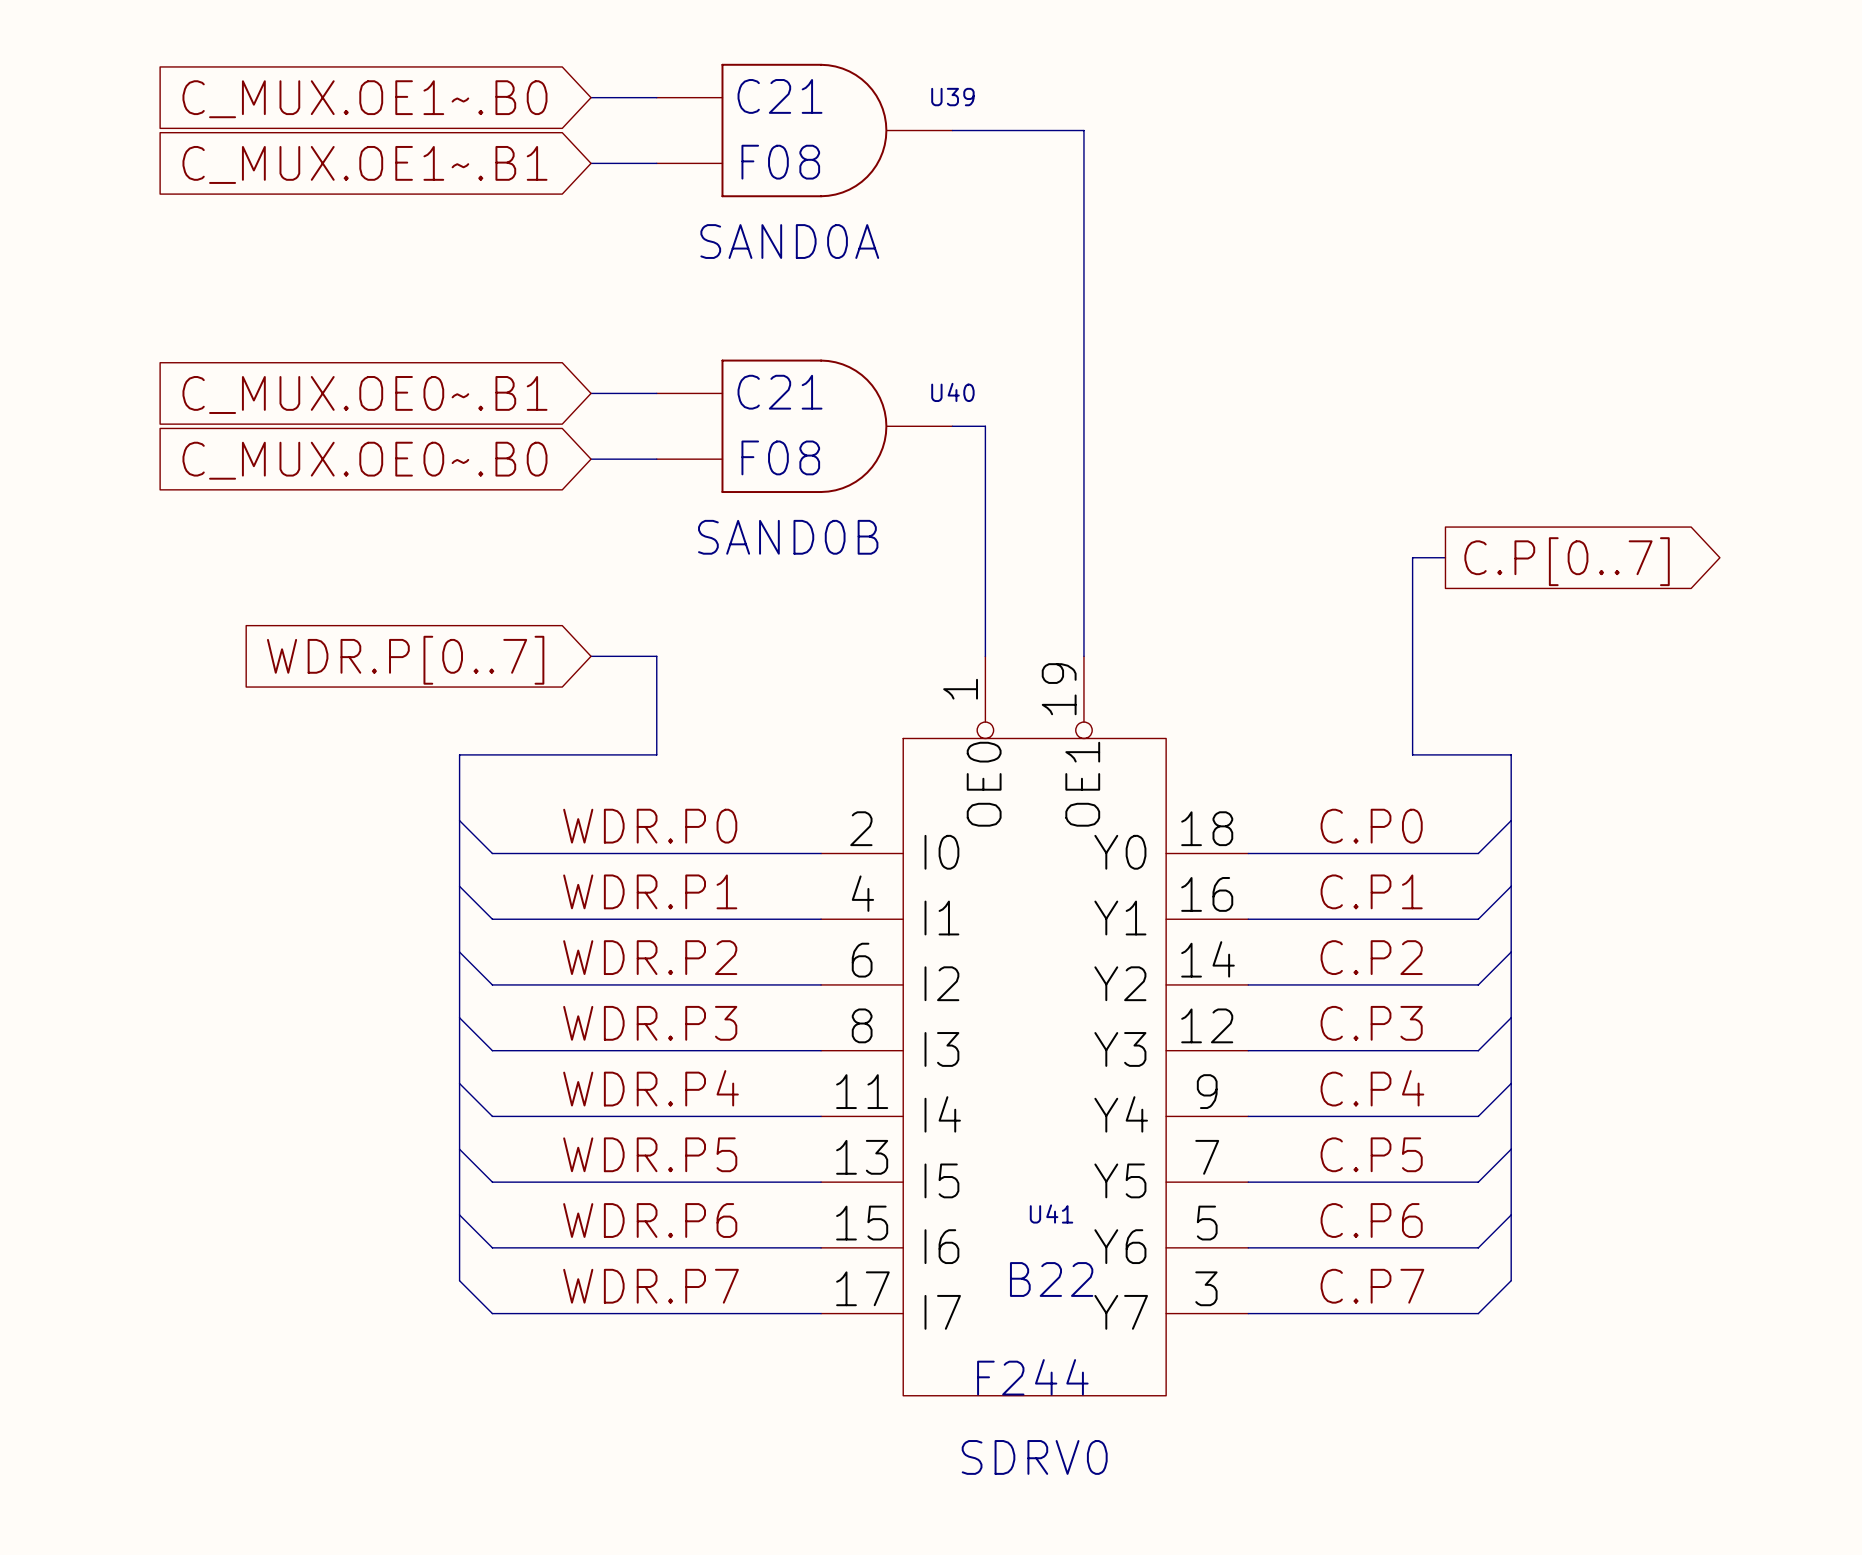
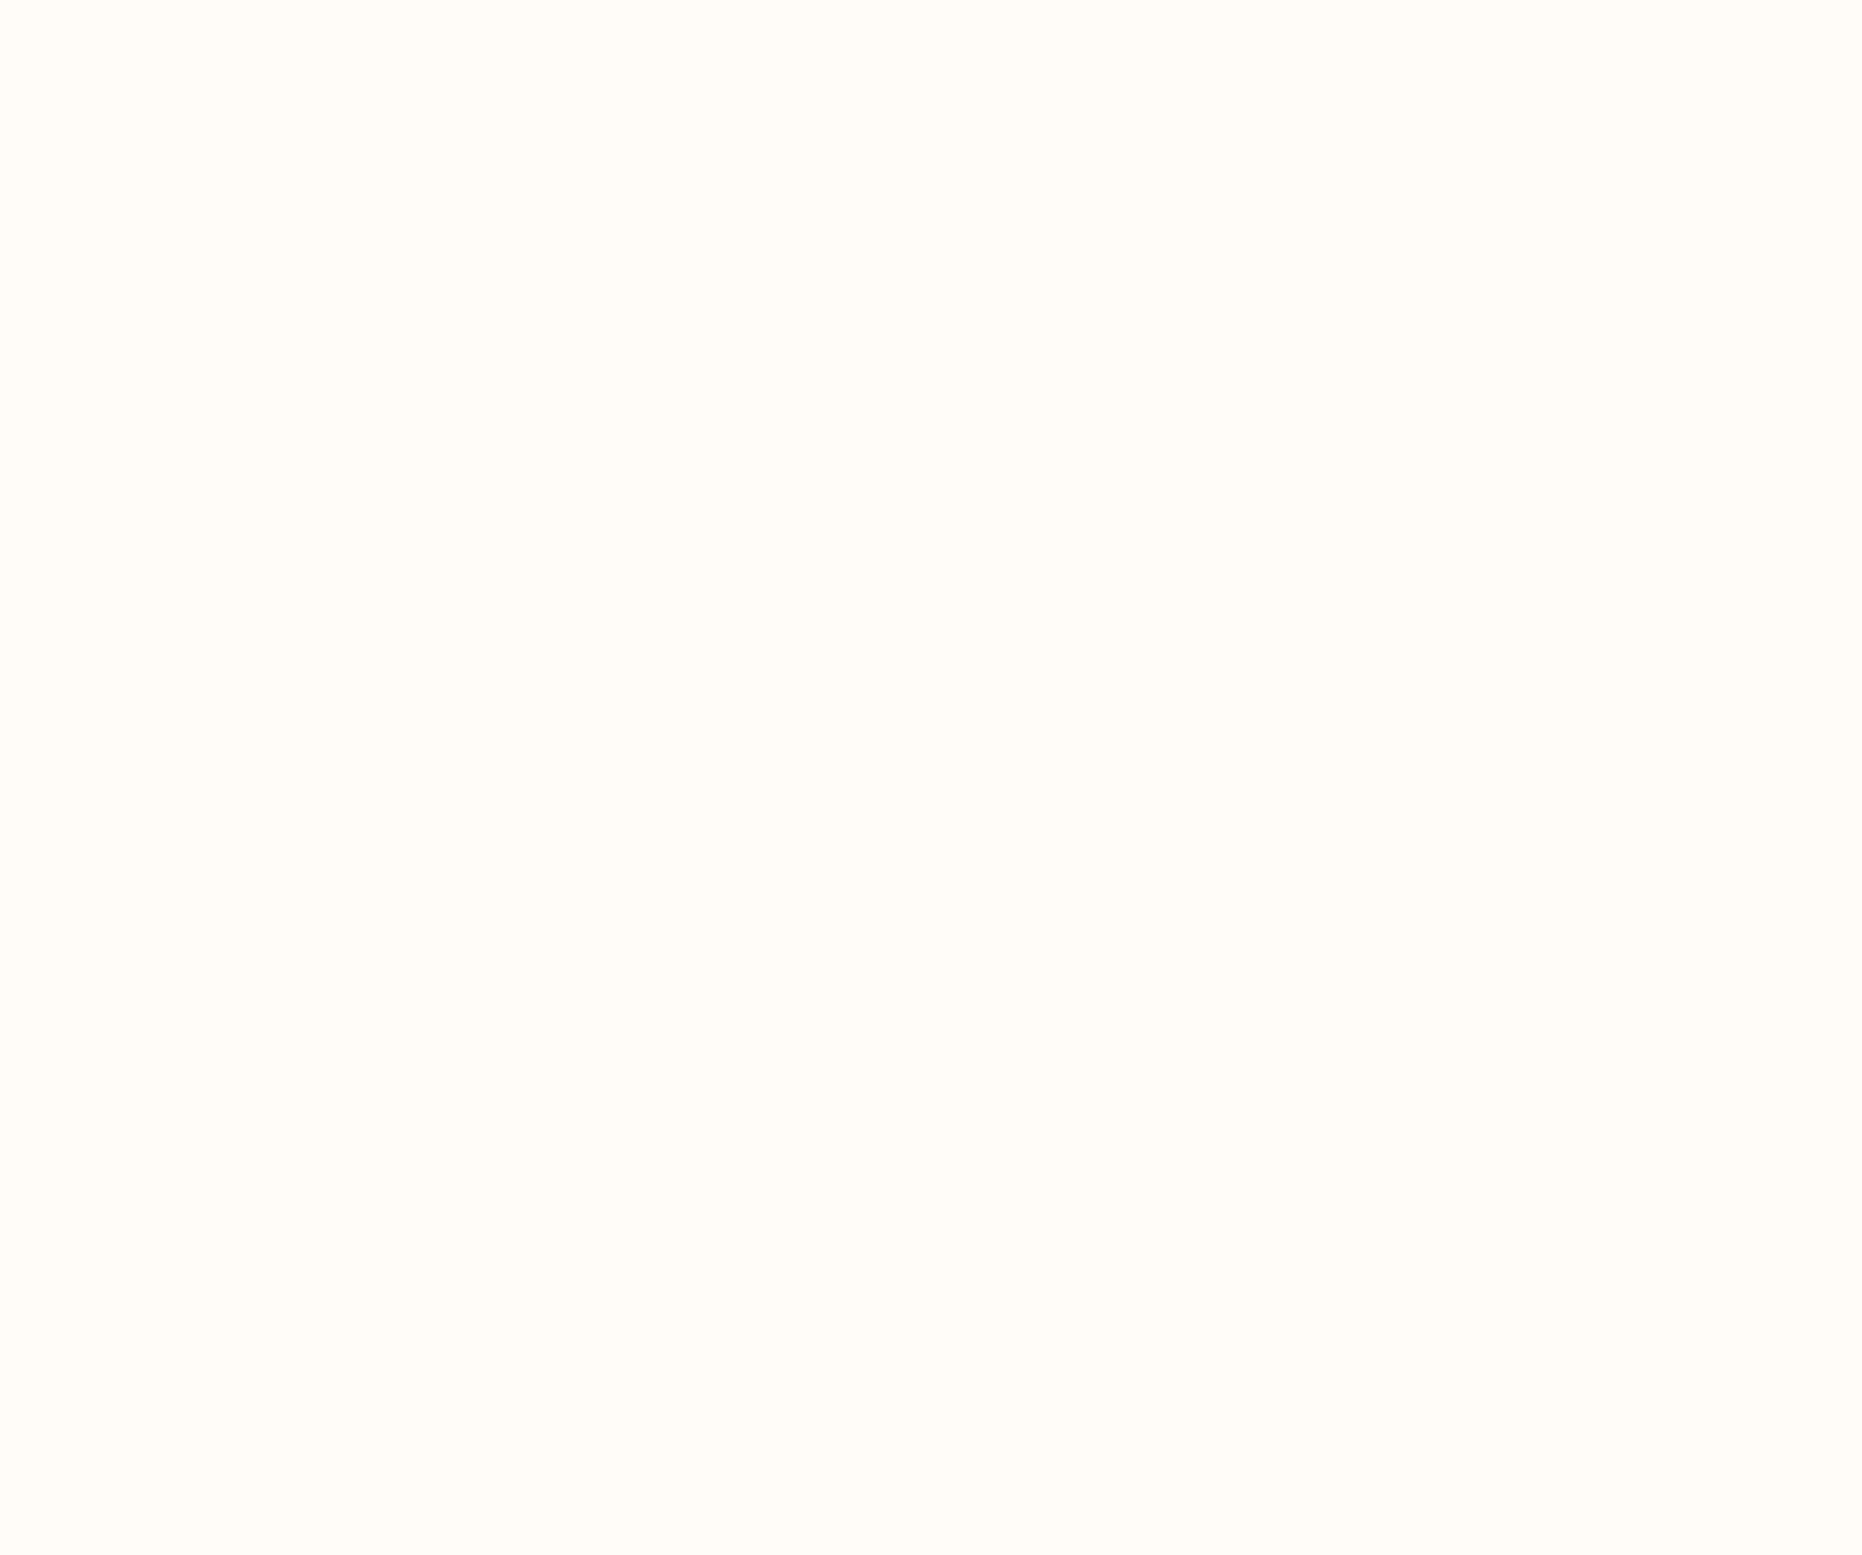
wire: (591, 97) (656, 97) -> none
global label: C_MUX.OE1~.B0 (364, 99) -> none
U39: F08 (804, 130) -> none
wire: (952, 130) (1083, 130) (1083, 656) -> none
wire: (591, 163) (656, 163) -> none
global label: C_MUX.OE1~.B1 (364, 164) -> none
wire: (591, 393) (656, 393) -> none
global label: C_MUX.OE0~.B1 (364, 394) -> none
U40: F08 (804, 426) -> none
wire: (952, 426) (985, 426) (985, 656) -> none
wire: (591, 459) (656, 459) -> none
global label: C_MUX.OE0~.B0 (364, 460) -> none
bus: (1445, 557) (1412, 557) (1412, 754) (1511, 754) (1511, 1280) -> none
global label: C.P[0..7] (1567, 561) -> none
bus: (591, 656) (656, 656) (656, 754) (459, 754) (459, 1280) -> none
global label: WDR.P[0..7] (405, 660) -> none
wire: (459, 820) (492, 853) (821, 853) -> none
wire: (1511, 820) (1478, 853) (1248, 853) -> none
label: WDR.P0 (650, 826) -> none
label: C.P0 (1371, 826) -> none
wire: (459, 886) (492, 919) (821, 919) -> none
wire: (1511, 886) (1478, 919) (1248, 919) -> none
label: WDR.P1 (650, 891) -> none
label: C.P1 (1371, 891) -> none
wire: (459, 952) (492, 984) (821, 984) -> none
wire: (1511, 952) (1478, 984) (1248, 984) -> none
label: WDR.P2 (650, 957) -> none
label: C.P2 (1371, 957) -> none
wire: (459, 1017) (492, 1050) (821, 1050) -> none
wire: (1511, 1017) (1478, 1050) (1248, 1050) -> none
label: WDR.P3 (650, 1023) -> none
label: C.P3 (1371, 1023) -> none
U41: F244 (1034, 1026) -> none
wire: (459, 1083) (492, 1116) (821, 1116) -> none
wire: (1511, 1083) (1478, 1116) (1248, 1116) -> none
label: WDR.P4 (651, 1088) -> none
label: C.P4 (1372, 1088) -> none
wire: (459, 1149) (492, 1182) (821, 1182) -> none
wire: (1511, 1149) (1478, 1182) (1248, 1182) -> none
label: WDR.P5 (650, 1154) -> none
label: C.P5 (1371, 1154) -> none
wire: (459, 1215) (492, 1247) (821, 1247) -> none
wire: (1511, 1215) (1478, 1247) (1248, 1247) -> none
label: WDR.P6 (650, 1220) -> none
label: C.P6 (1371, 1220) -> none
wire: (459, 1280) (492, 1313) (821, 1313) -> none
wire: (1511, 1280) (1478, 1313) (1248, 1313) -> none
label: WDR.P7 (651, 1286) -> none
label: C.P7 (1372, 1286) -> none

